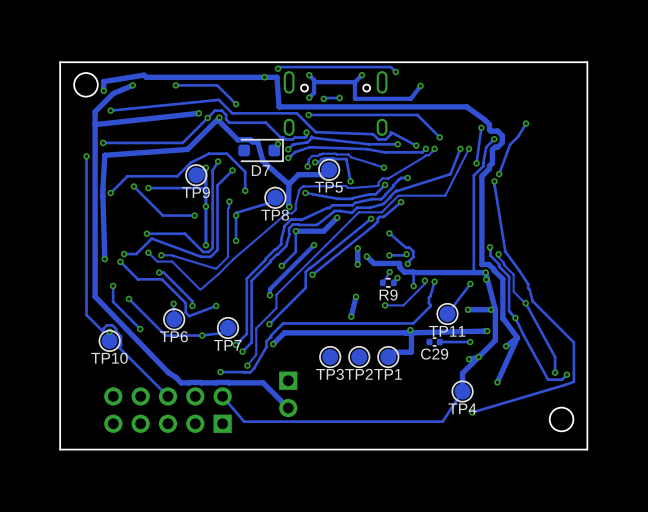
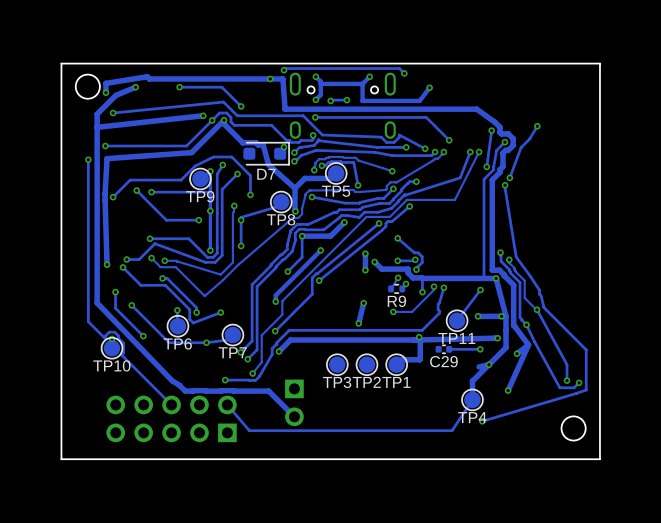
via: (486, 279) -> none
via: (469, 359) -> none

